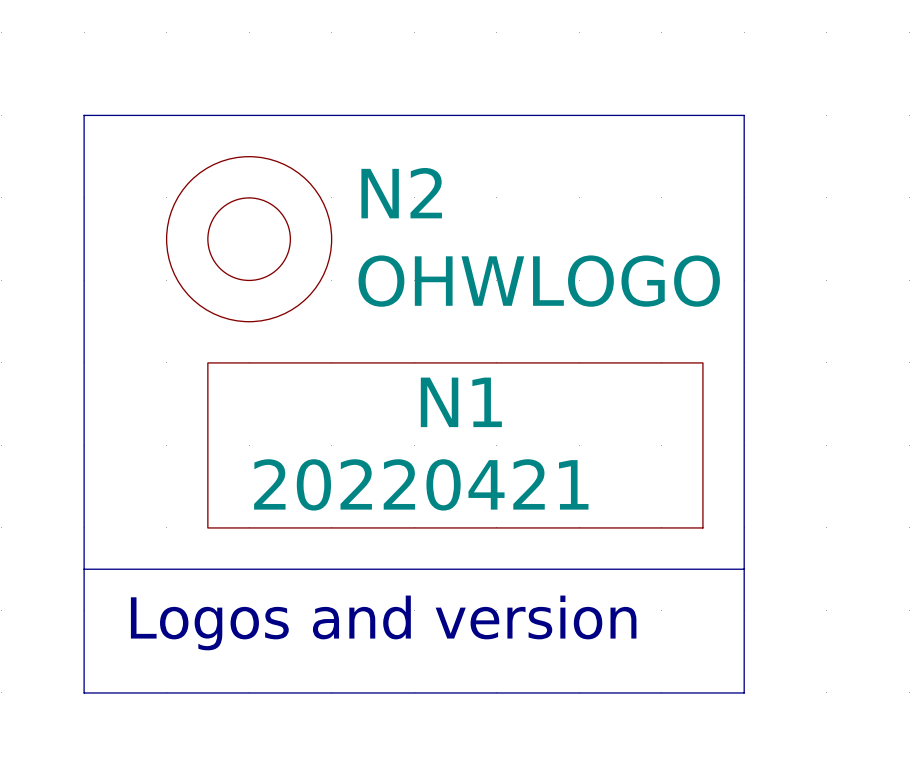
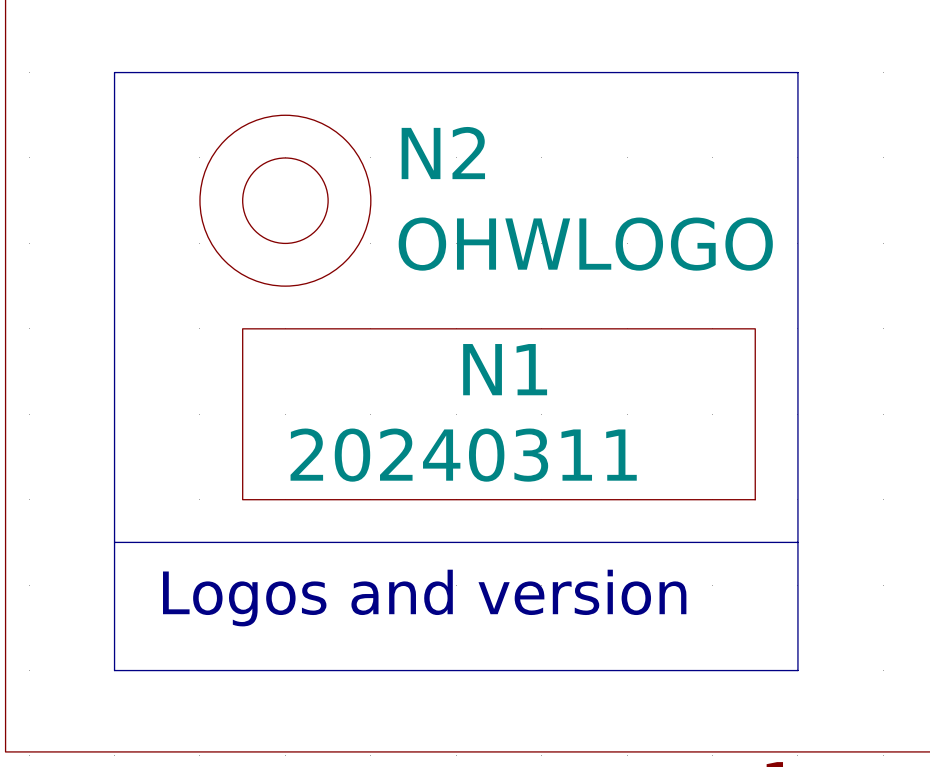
N1 value: 20220421 (421, 484) -> 20240311 (463, 455)

